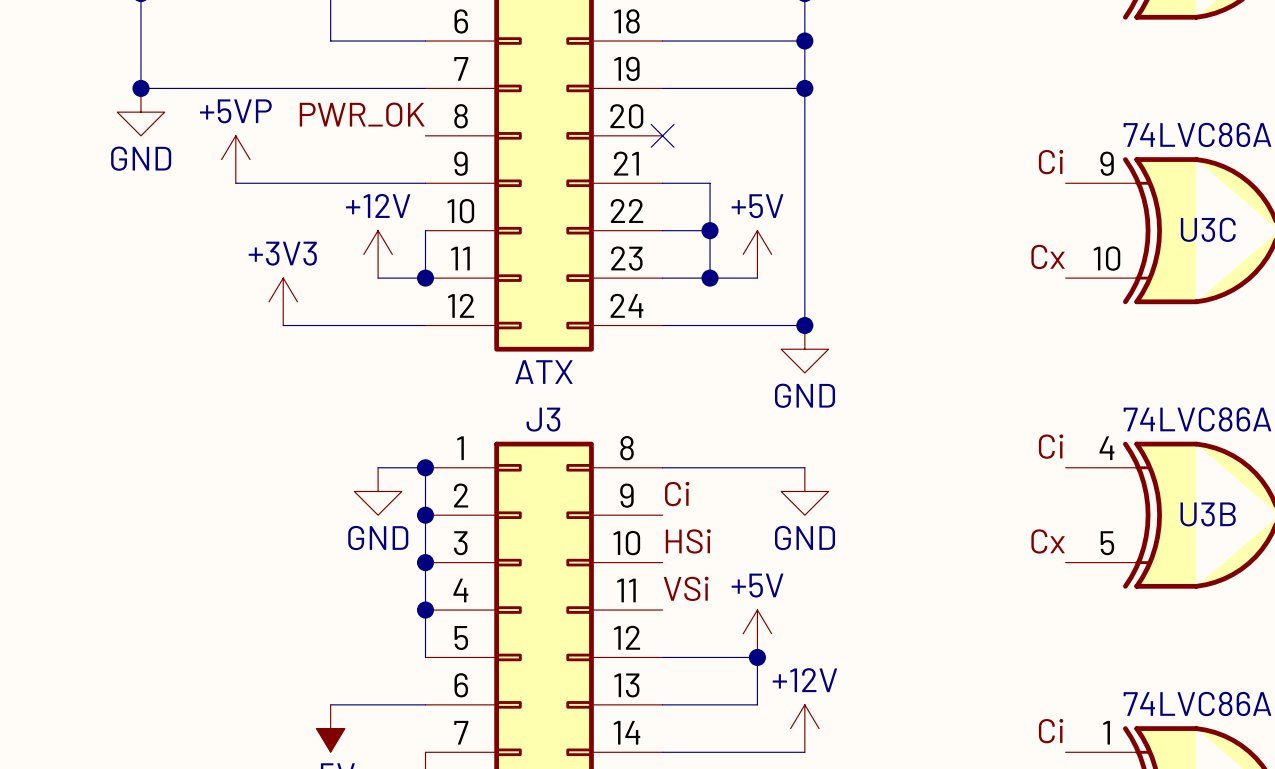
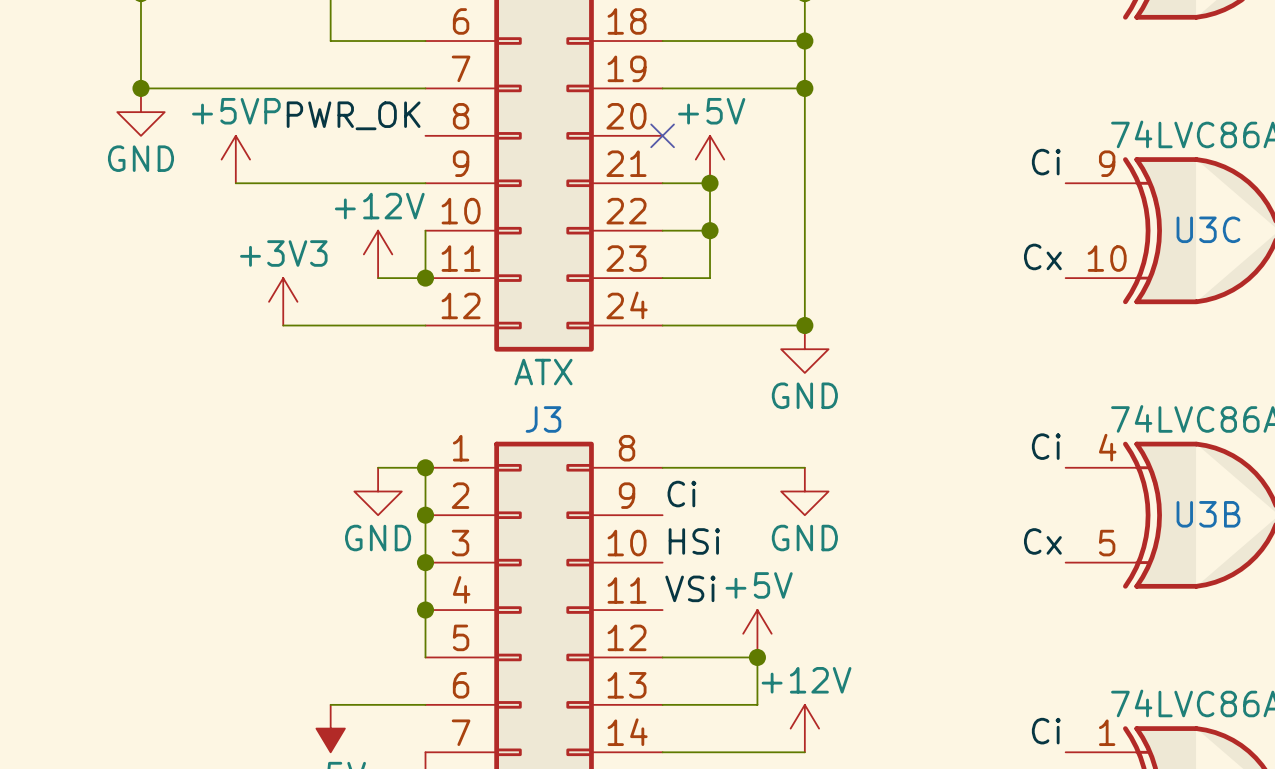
power symbol position: +5V (757, 254) -> +5V (710, 159)
wire: (710, 278) (757, 278) -> none
junction position: (710, 278) -> (710, 183)

